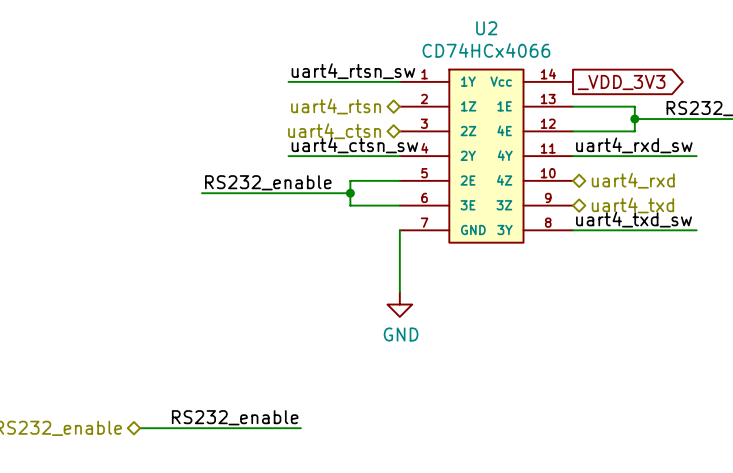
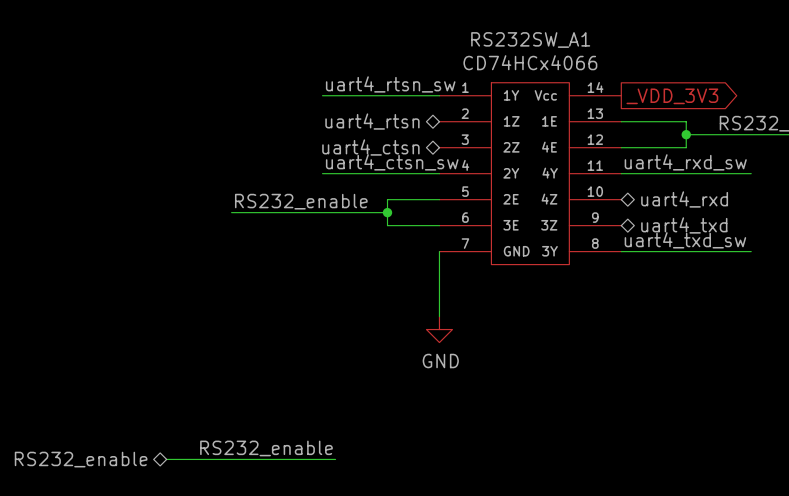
U2 name: U2 (486, 28) -> RS232SW_A1 (530, 40)

